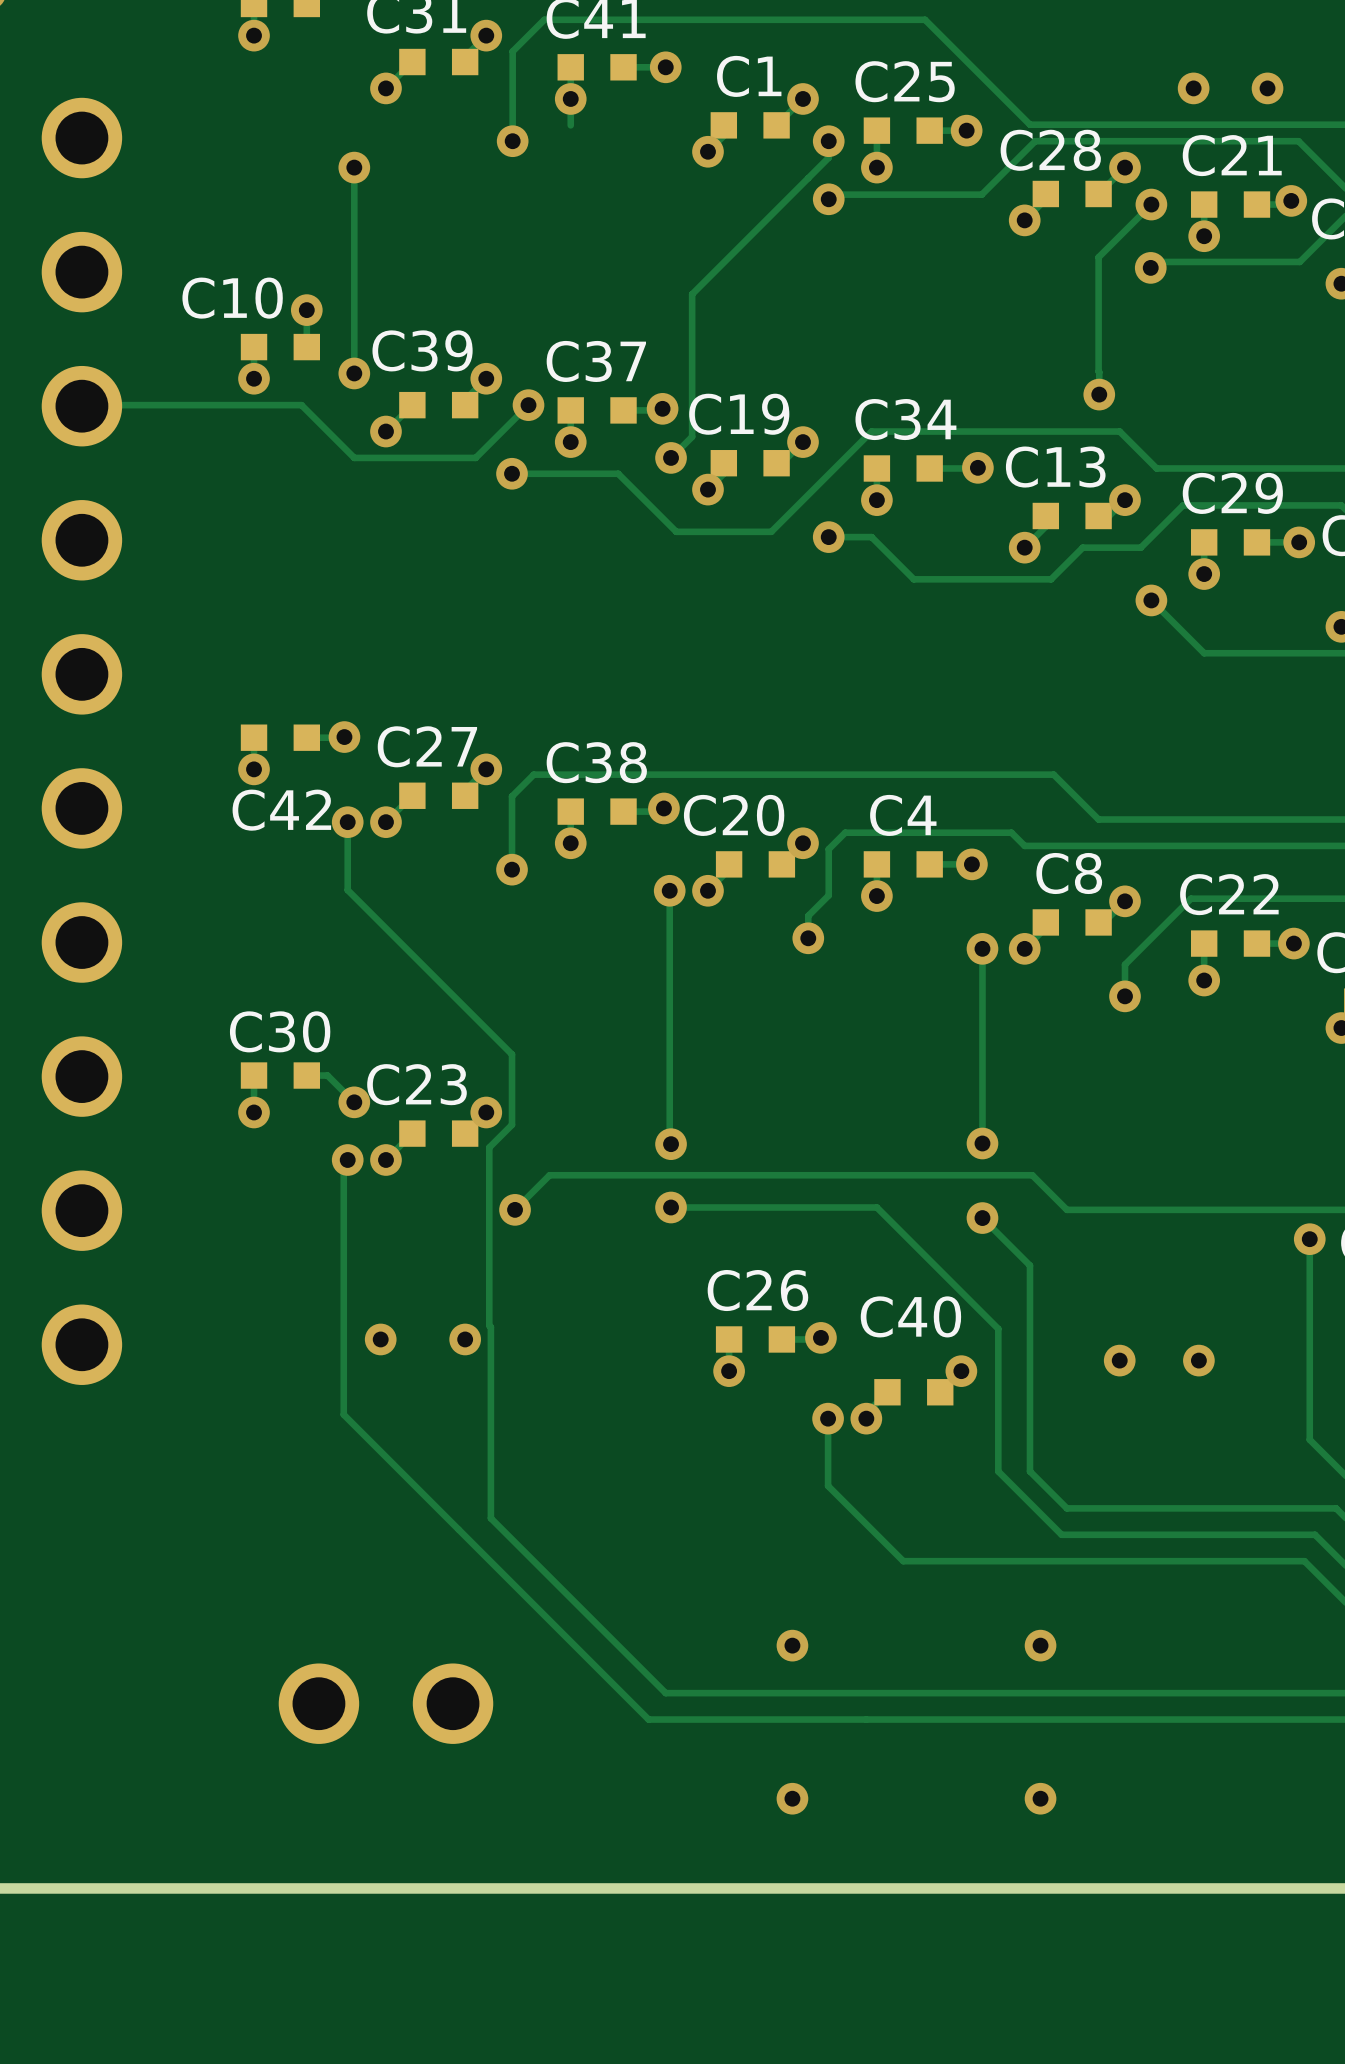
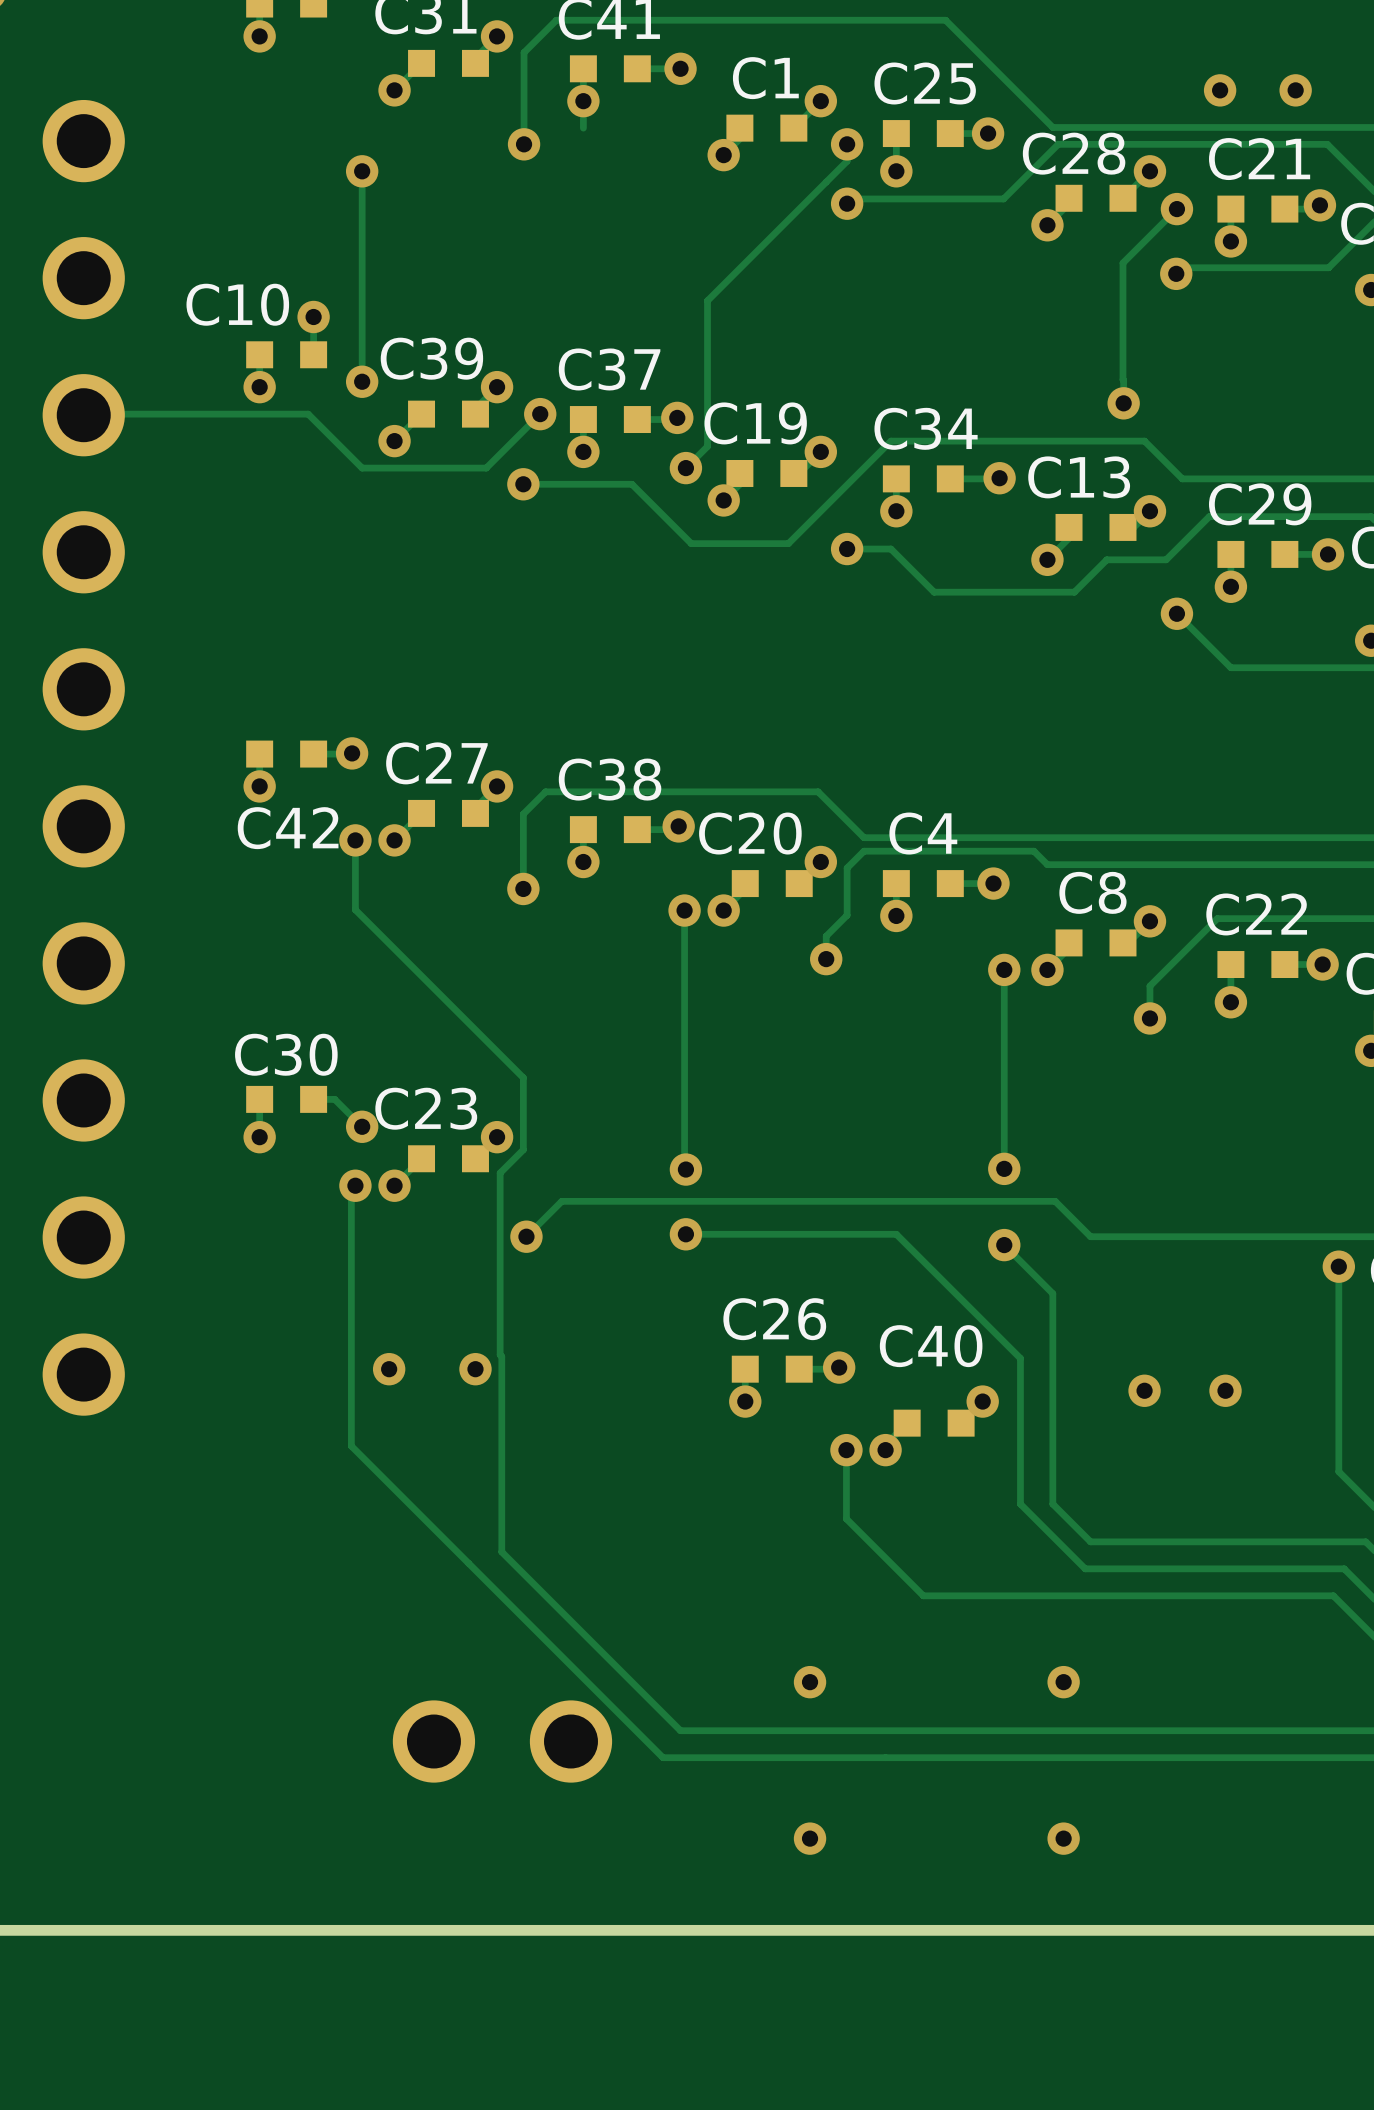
track: (800, 774) (1053, 774) (1098, 819) -> (818, 791) (863, 837) (1122, 837)
part position: (385, 1703) -> (502, 1741)

